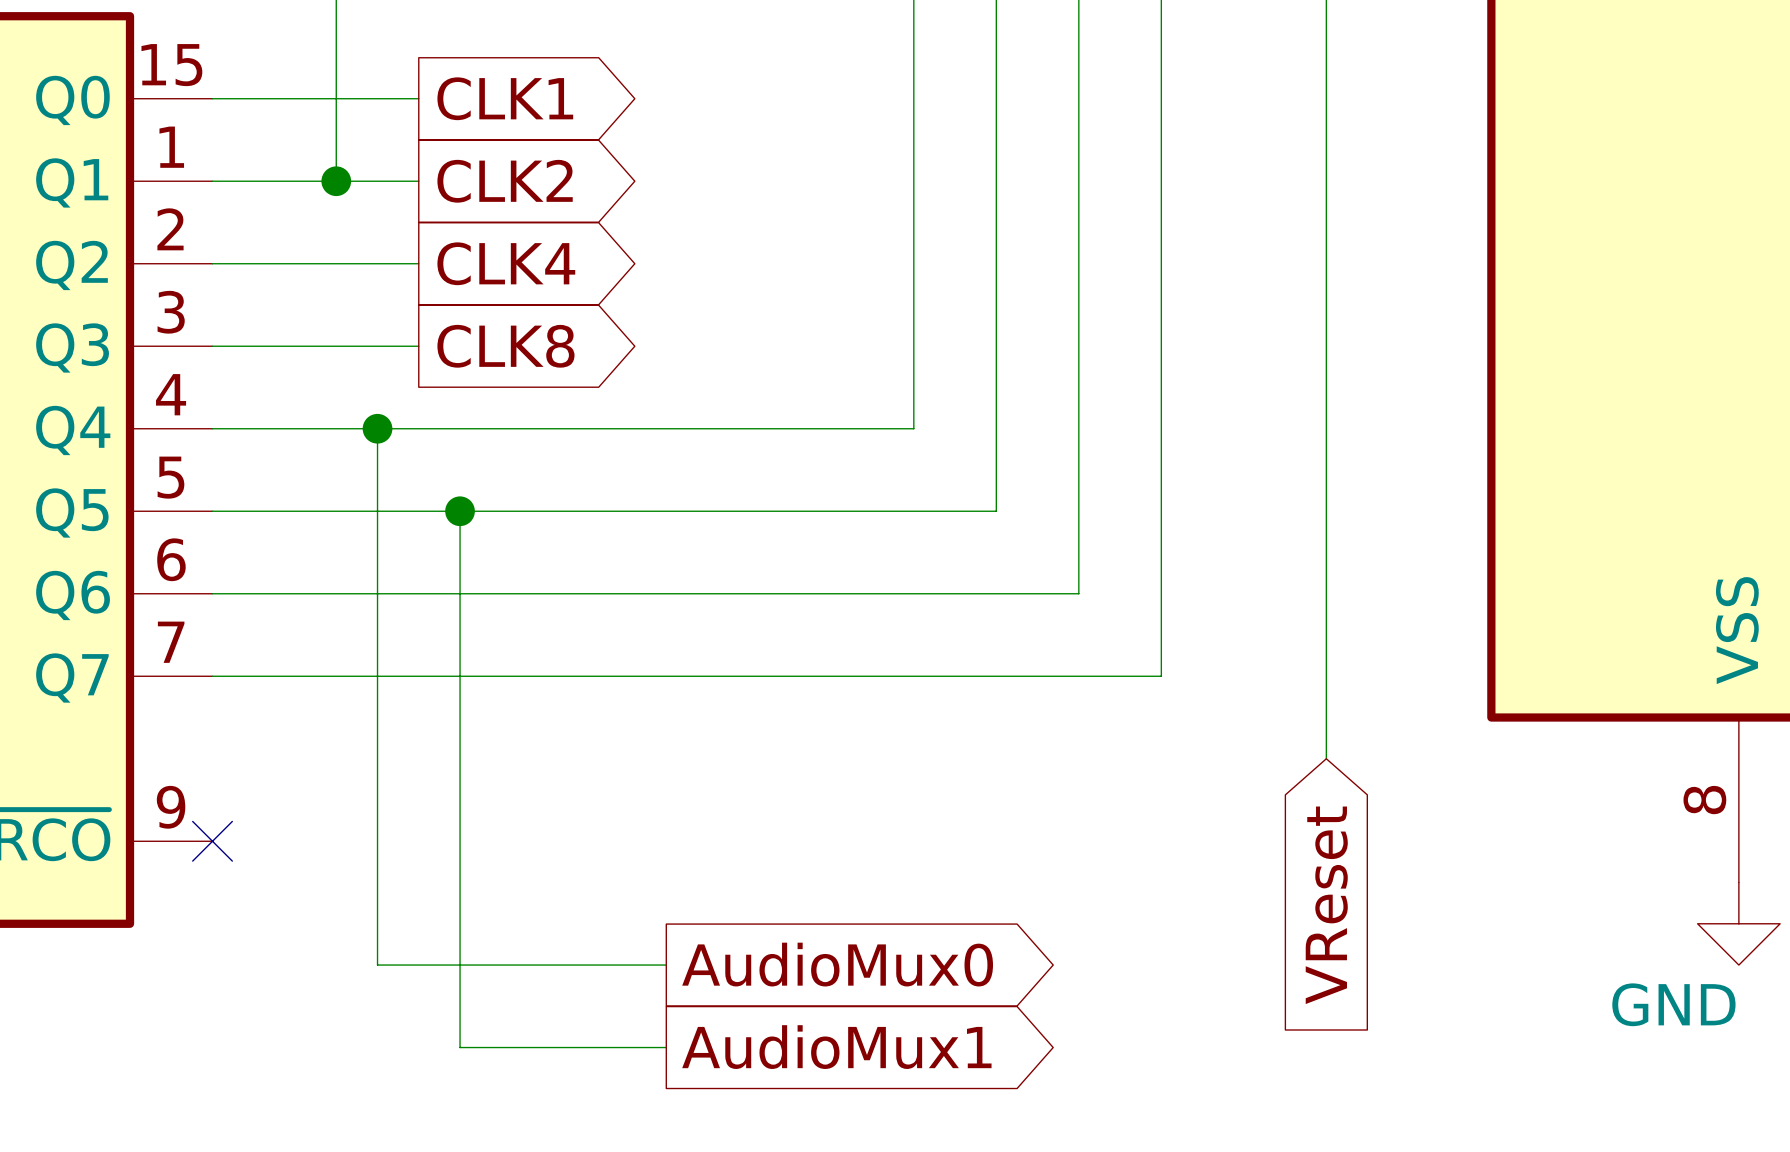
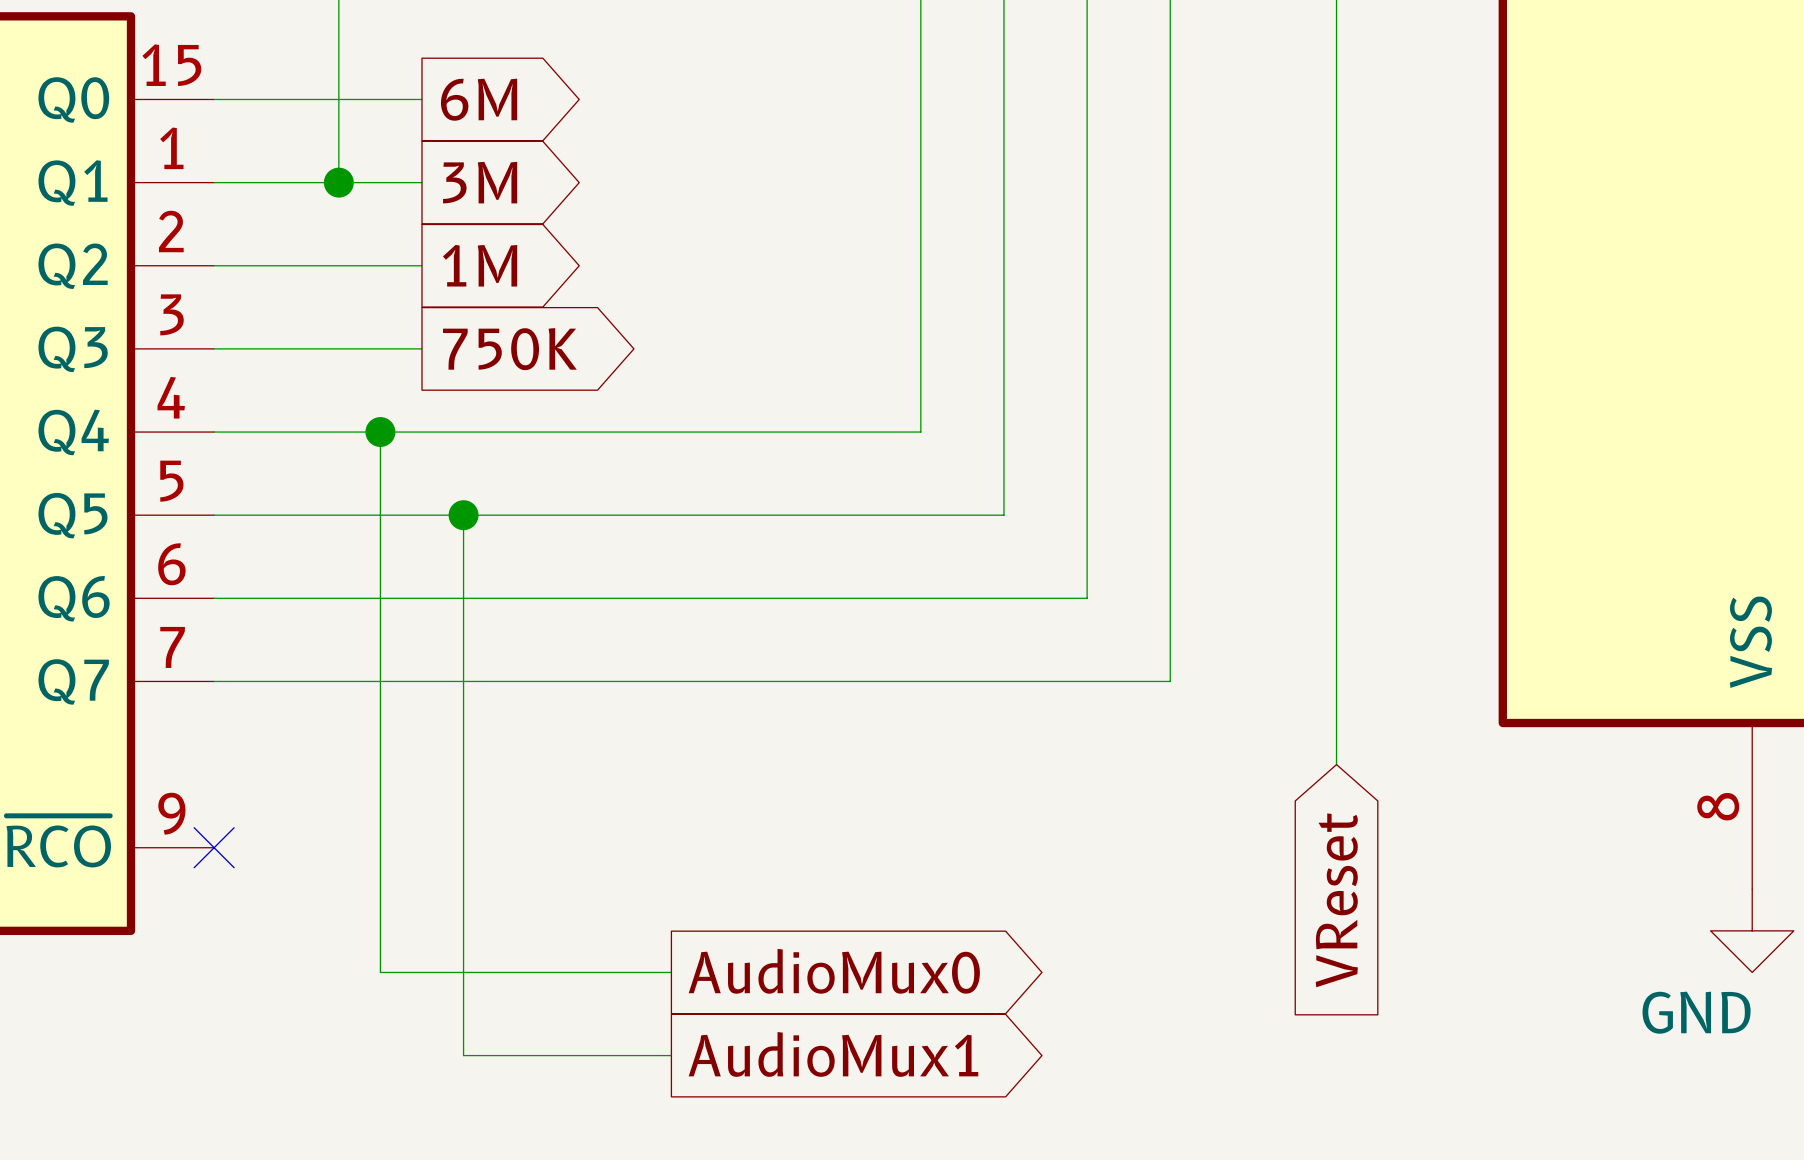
global label: CLK1 (505, 98) -> 6M (479, 99)
global label: CLK2 (505, 181) -> 3M (480, 182)
global label: CLK4 (506, 263) -> 1M (480, 265)
global label: CLK8 (505, 346) -> 750K (509, 349)

